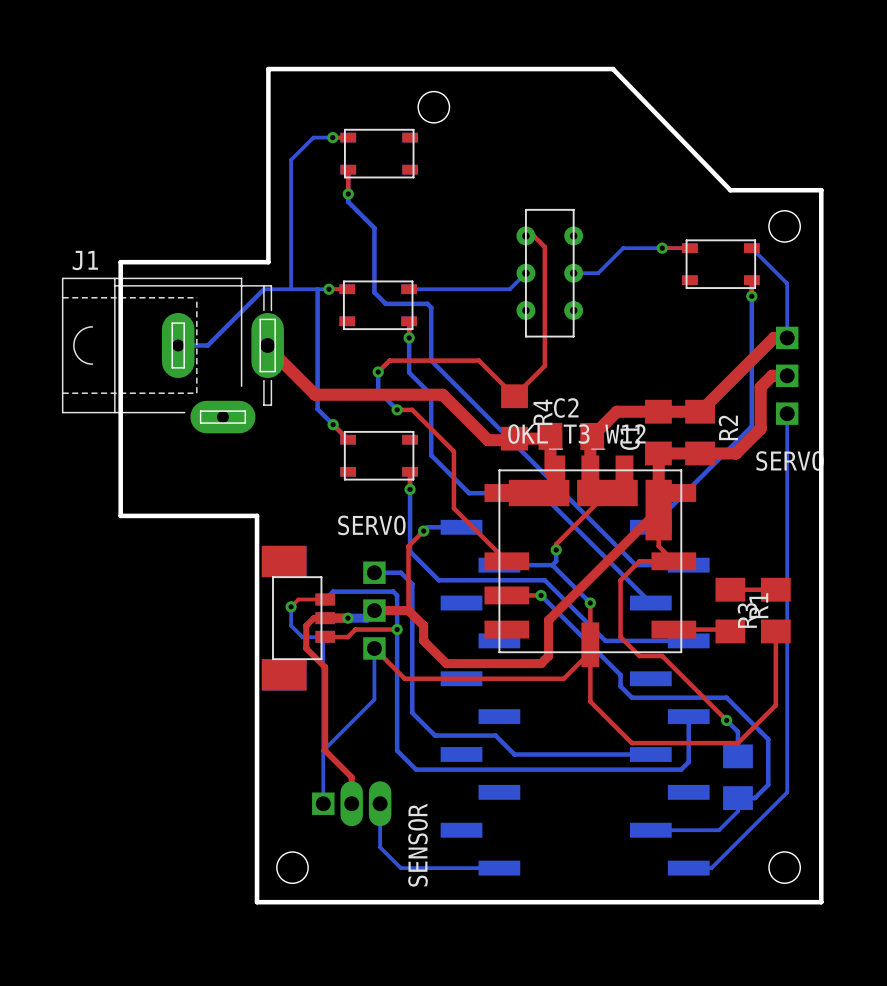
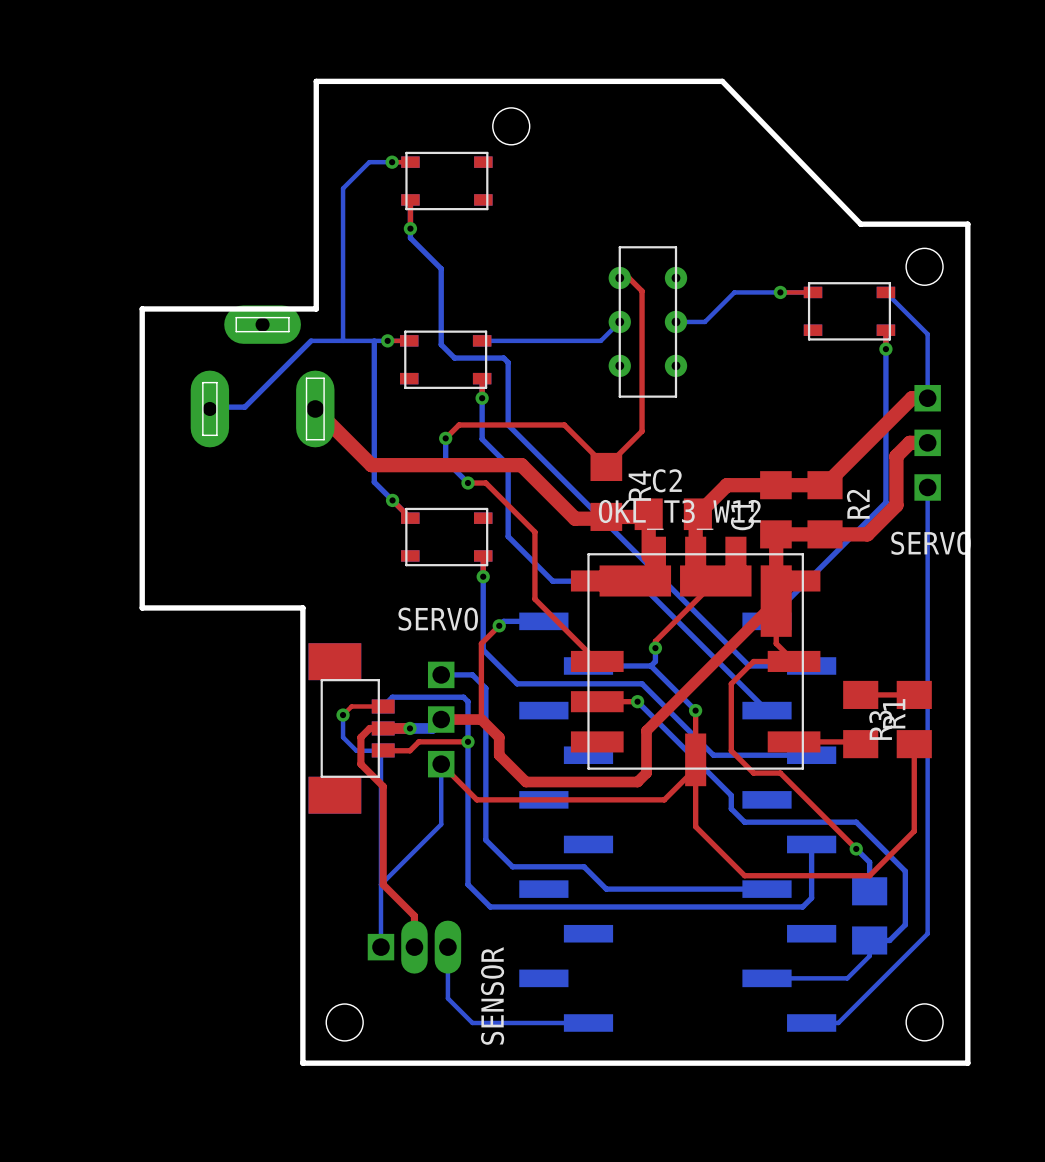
J1 side: top (172, 355) -> bottom (262, 376)

